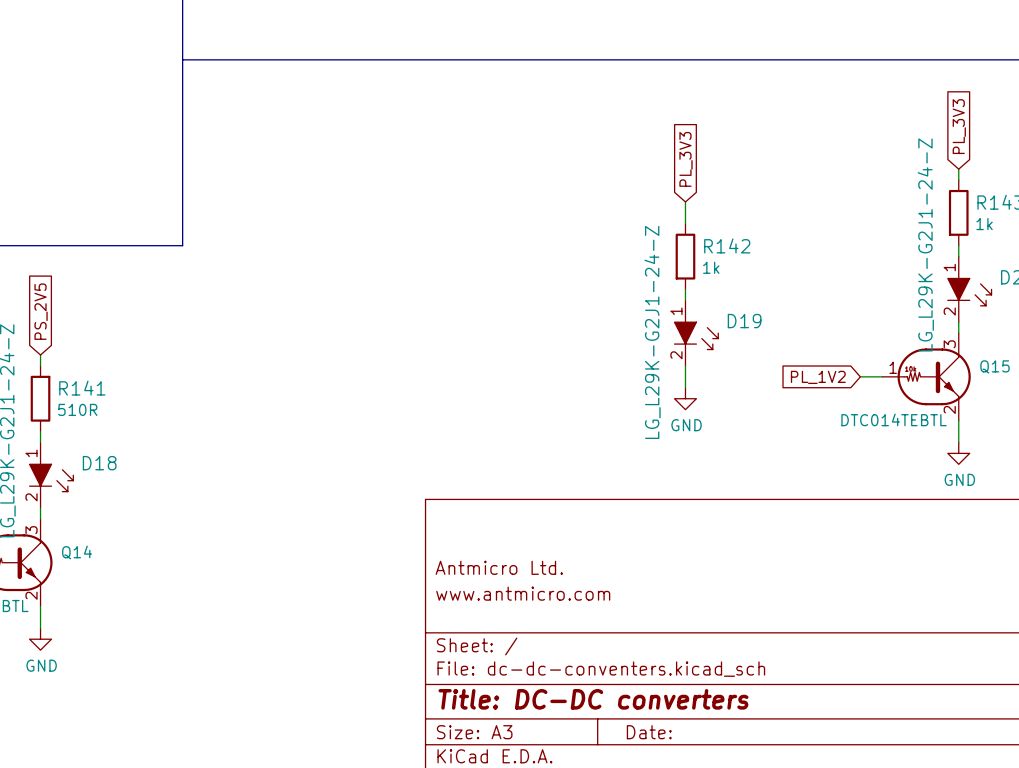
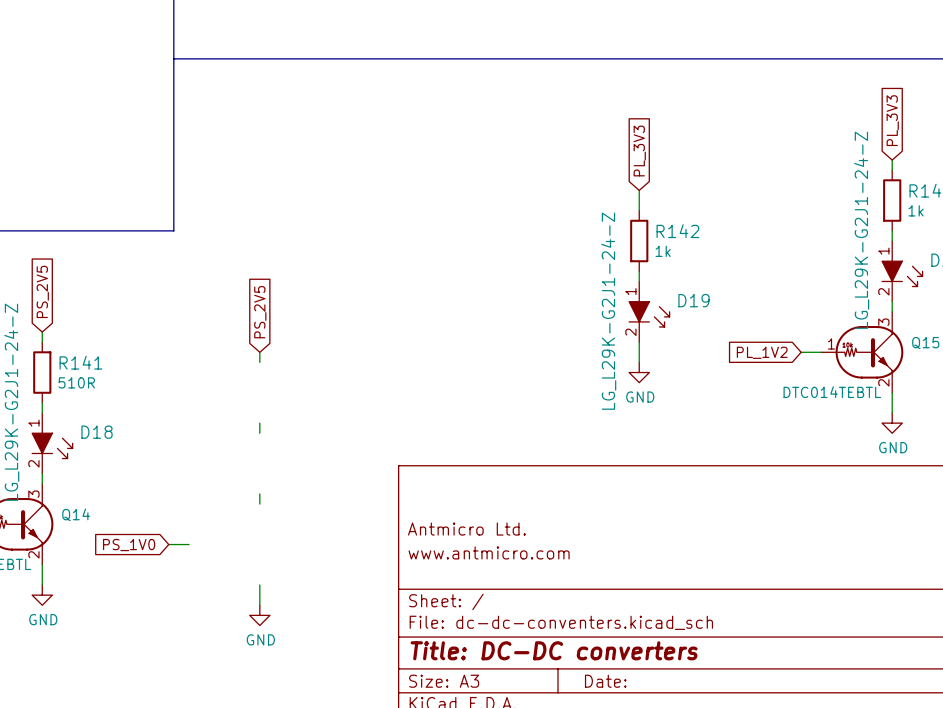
global label: none -> PS_2V5 (260, 312)
wire: none -> (259, 352) (259, 362)
wire: none -> (259, 423) (259, 433)
wire: none -> (259, 493) (259, 504)
wire: none -> (168, 544) (188, 544)
global label: none -> PS_1V0 (129, 545)
wire: none -> (259, 585) (259, 605)
power symbol: none -> GND (259, 615)

